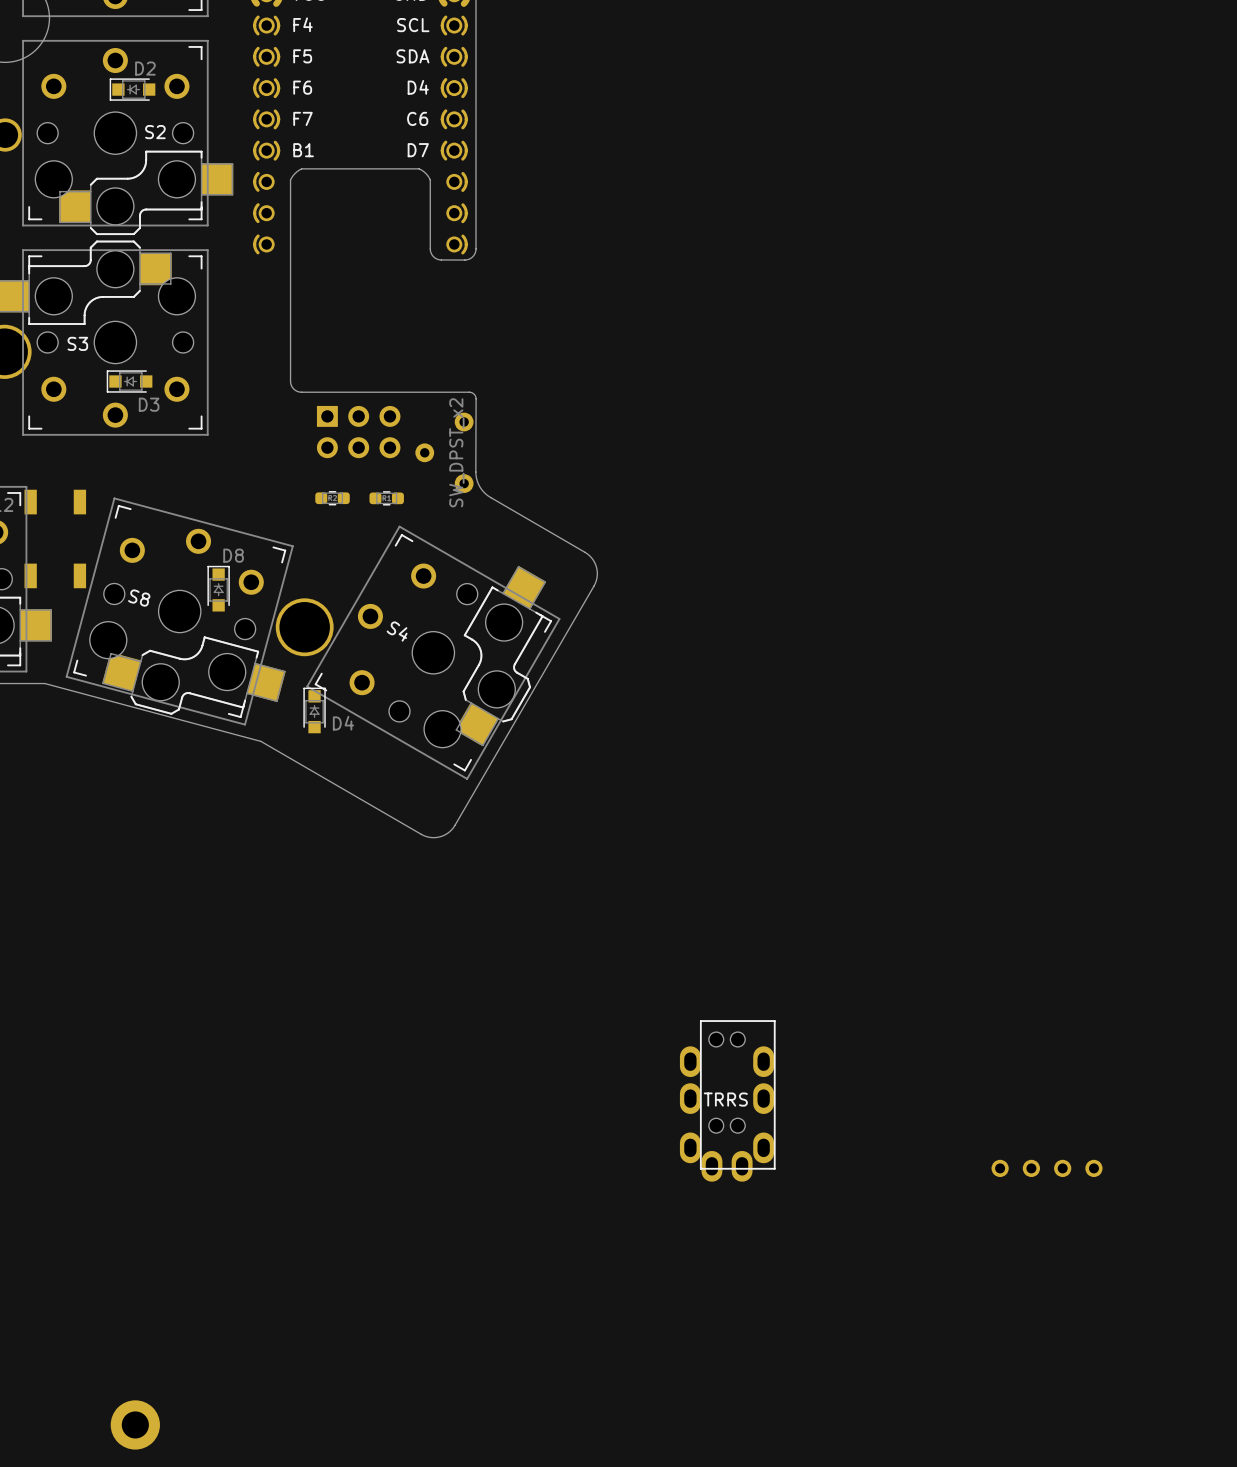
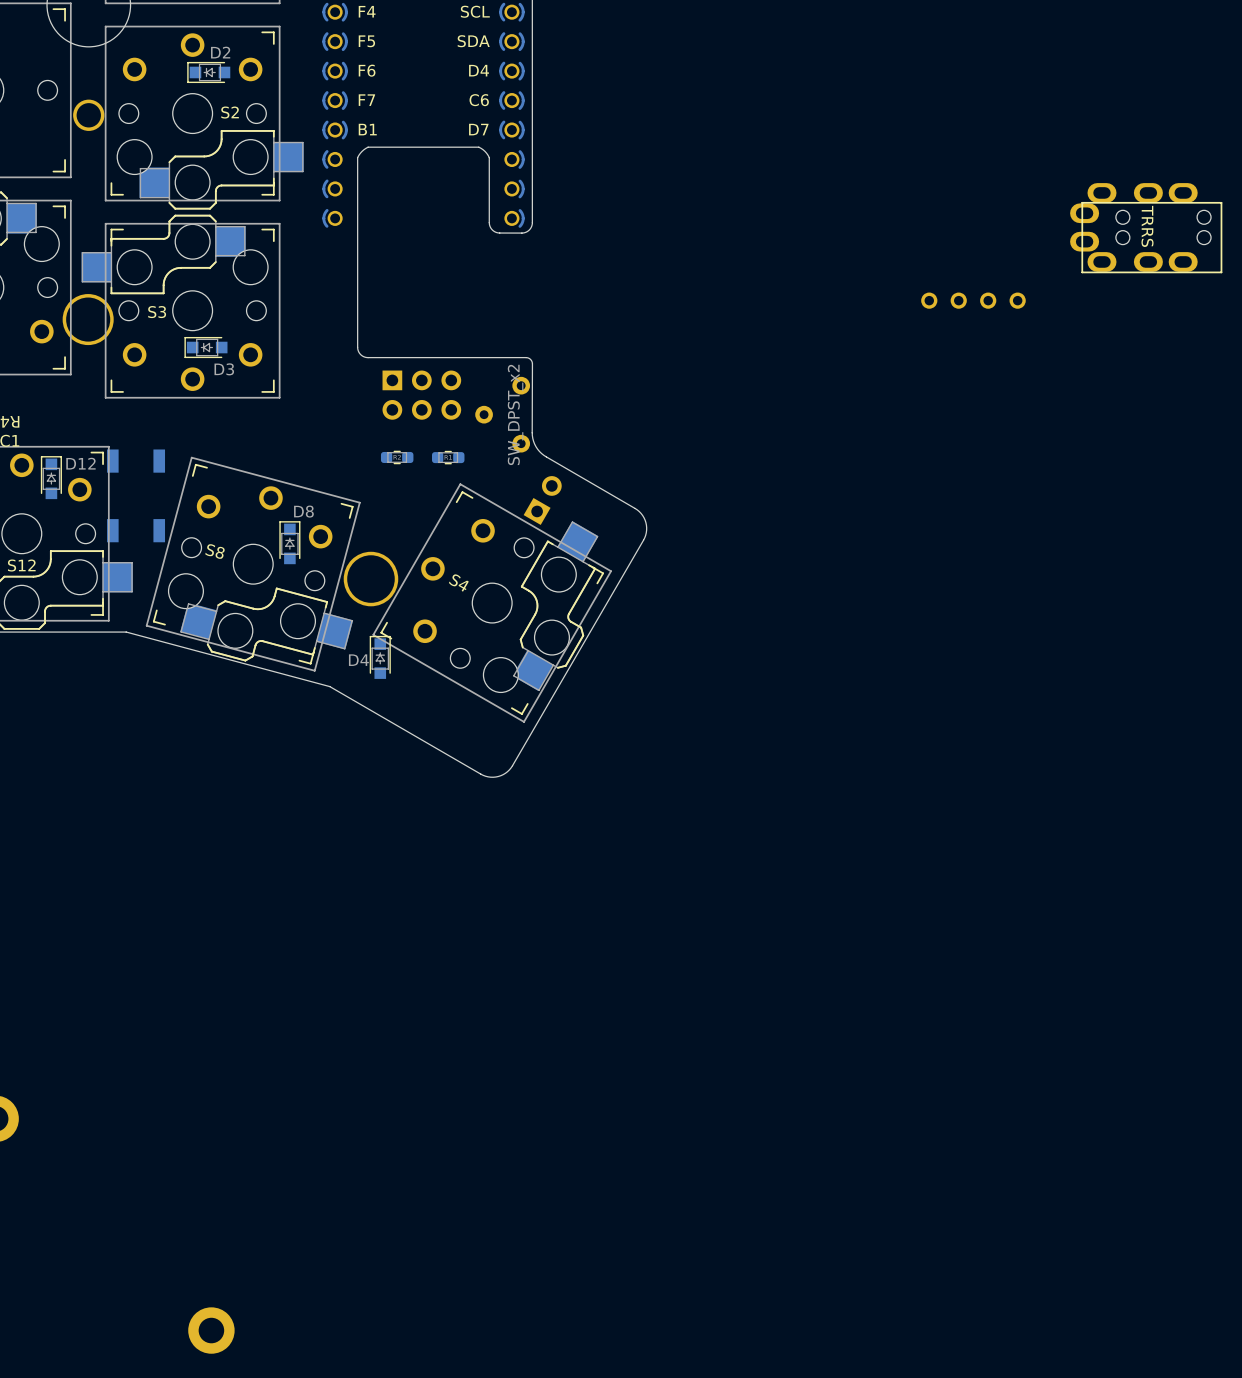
part: none -> (1146, 228)
part: none -> (973, 300)
part: none -> (542, 500)
D4 name position: D4 (343, 723) -> D4 (358, 660)
part: (727, 1100) -> none
part: (1047, 1168) -> none

